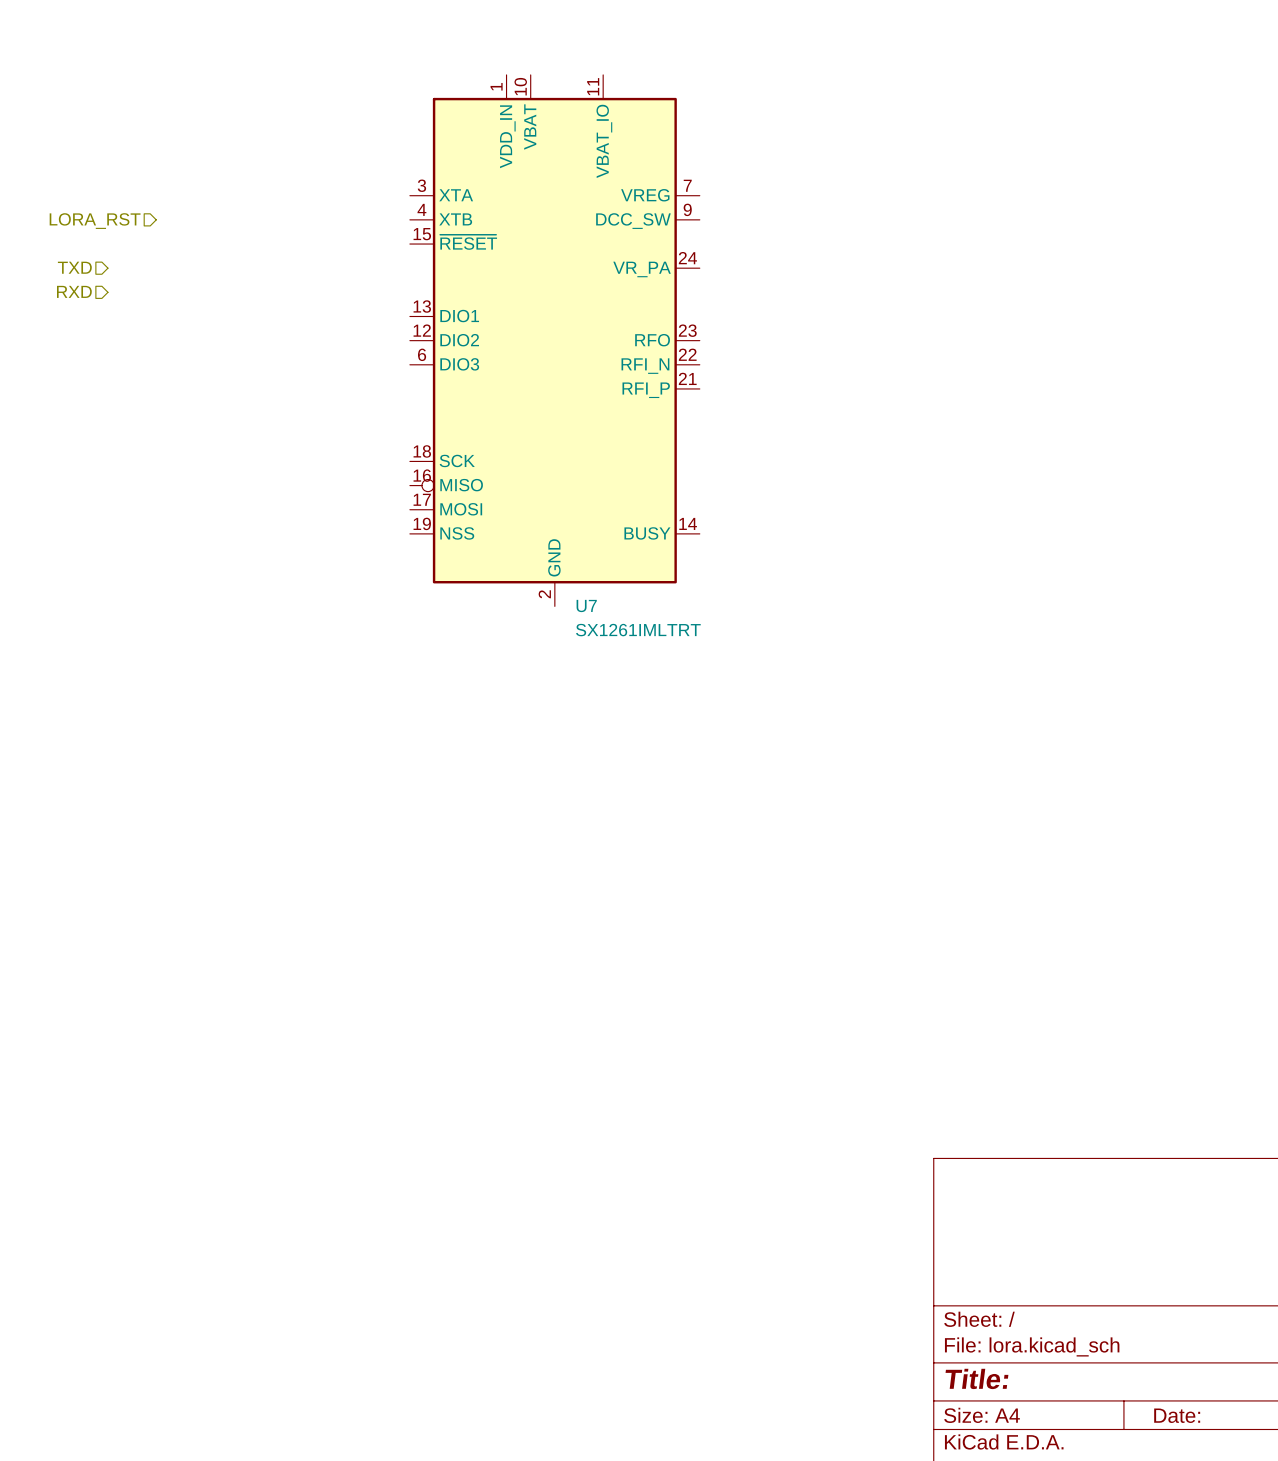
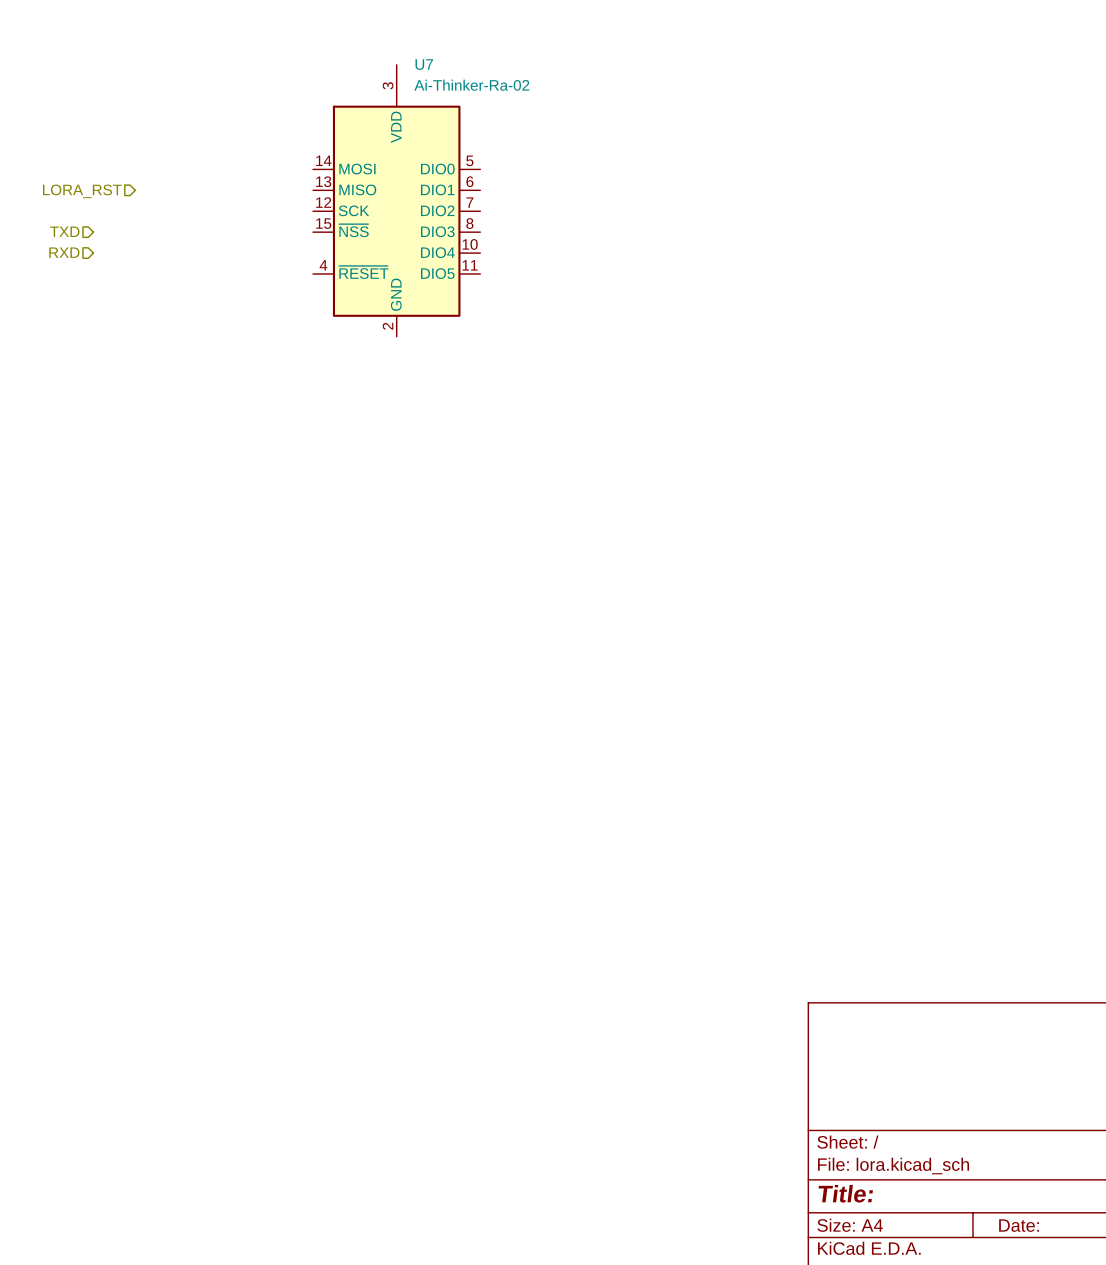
U7 symbol: [409, 74, 700, 607] -> [313, 64, 481, 337]
U7 name position: U7 (586, 606) -> U7 (424, 64)
U7 value: SX1261IMLTRT (638, 630) -> Ai-Thinker-Ra-02 (471, 85)

